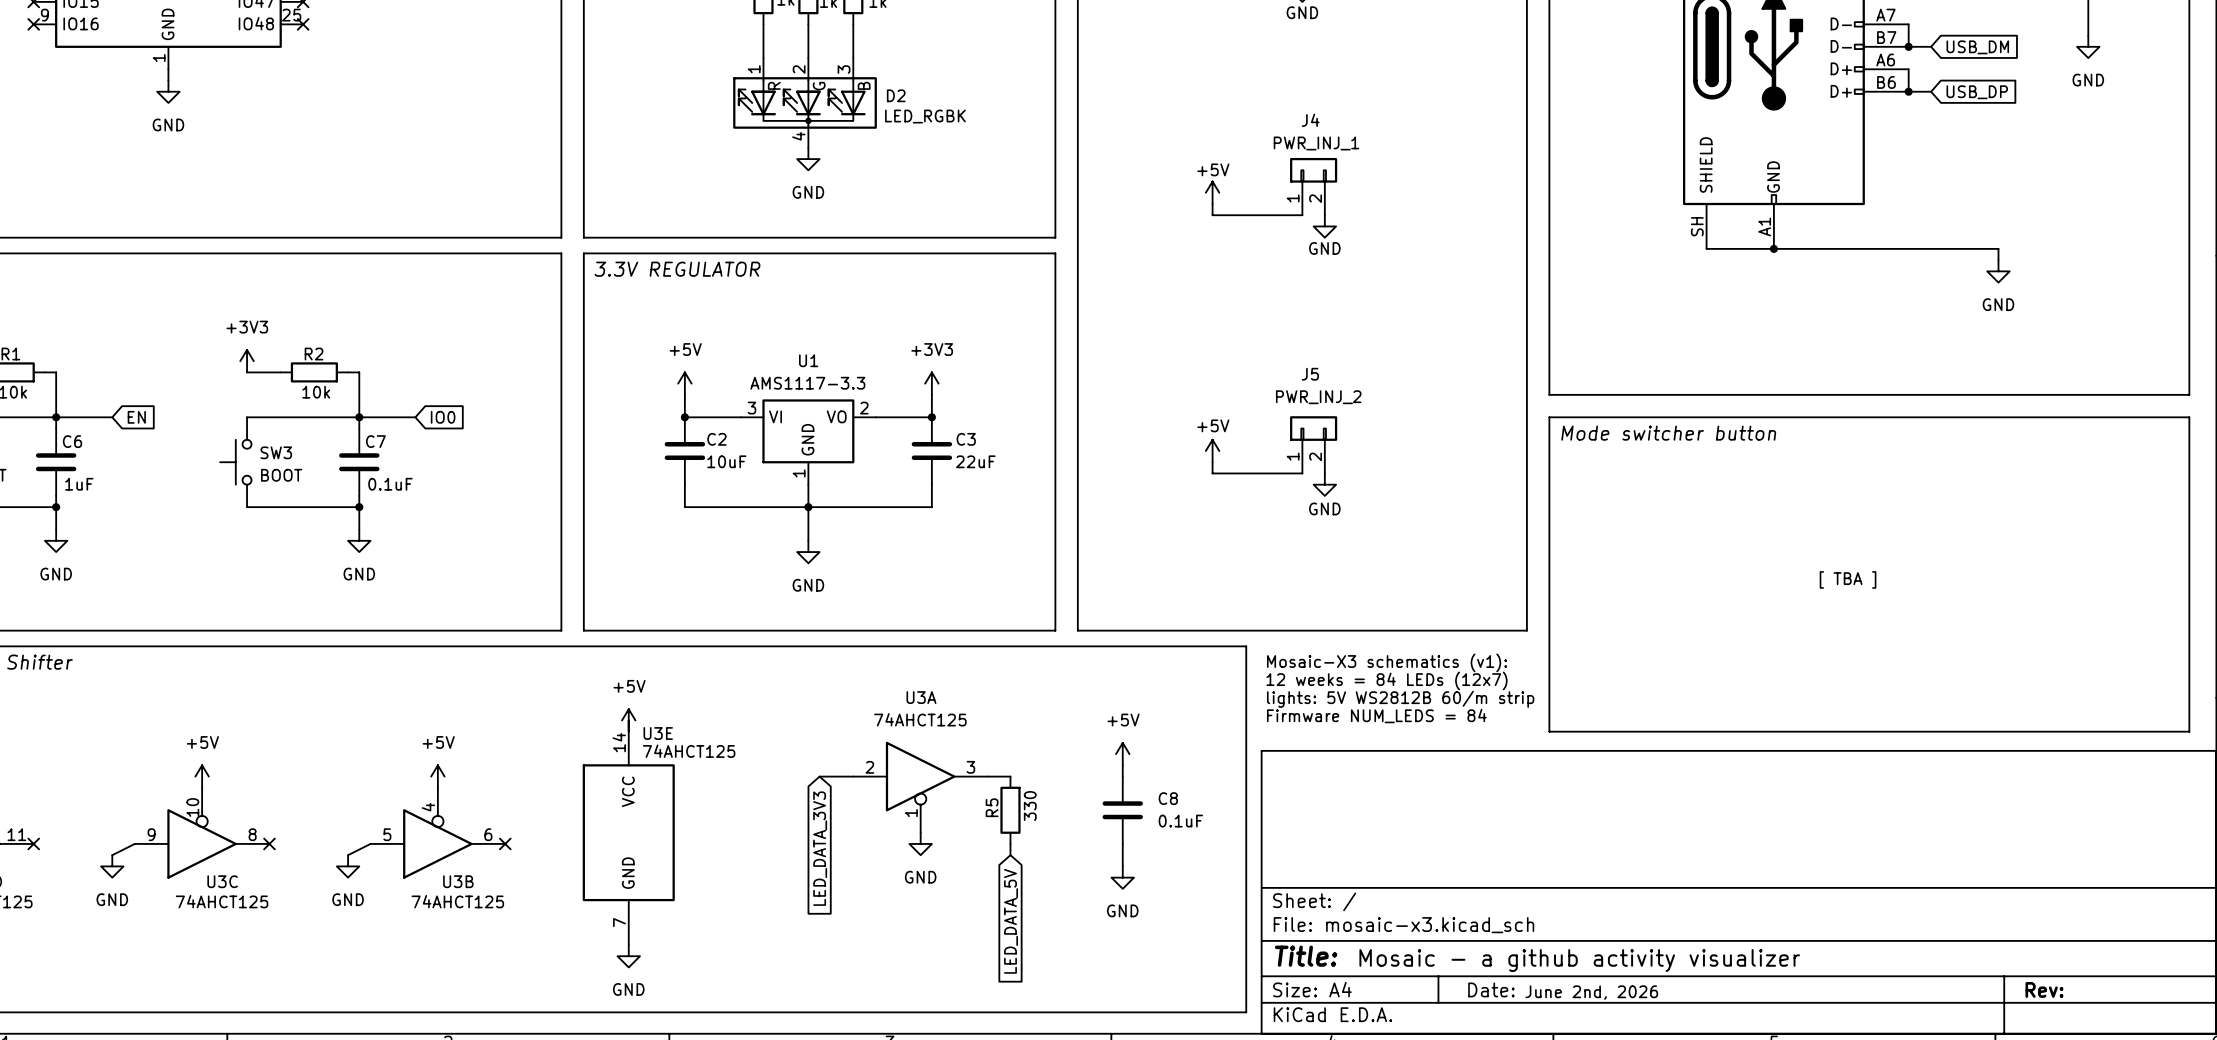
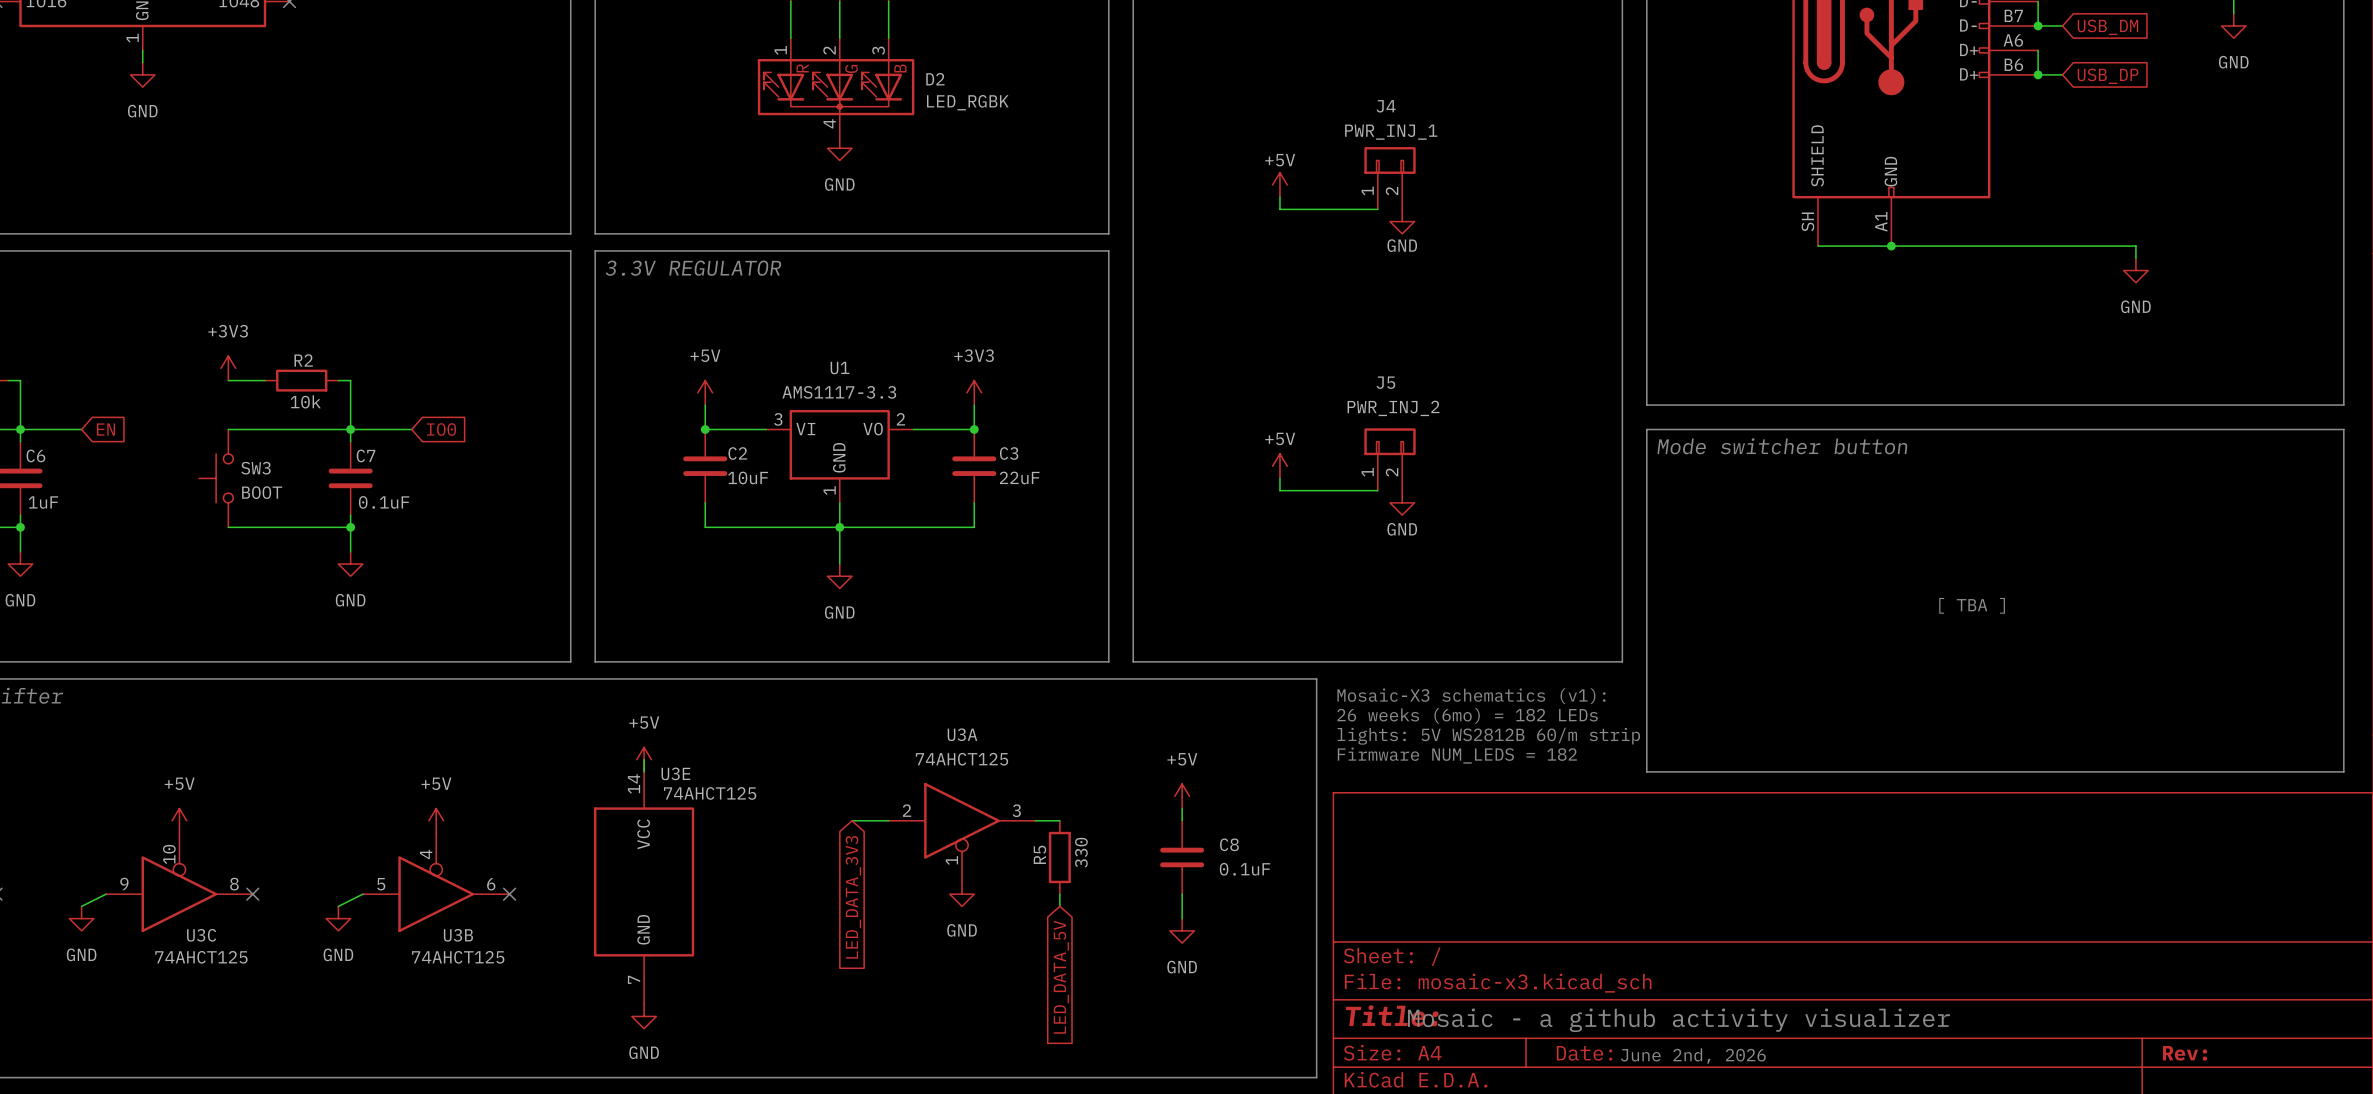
text: 12 weeks = 84 LEDs (12x7) (1387, 680) -> 26 weeks (6mo) = 182 LEDs (1467, 715)
text: Firmware NUM_LEDS = 84 (1376, 716) -> Firmware NUM_LEDS = 182 (1457, 755)

